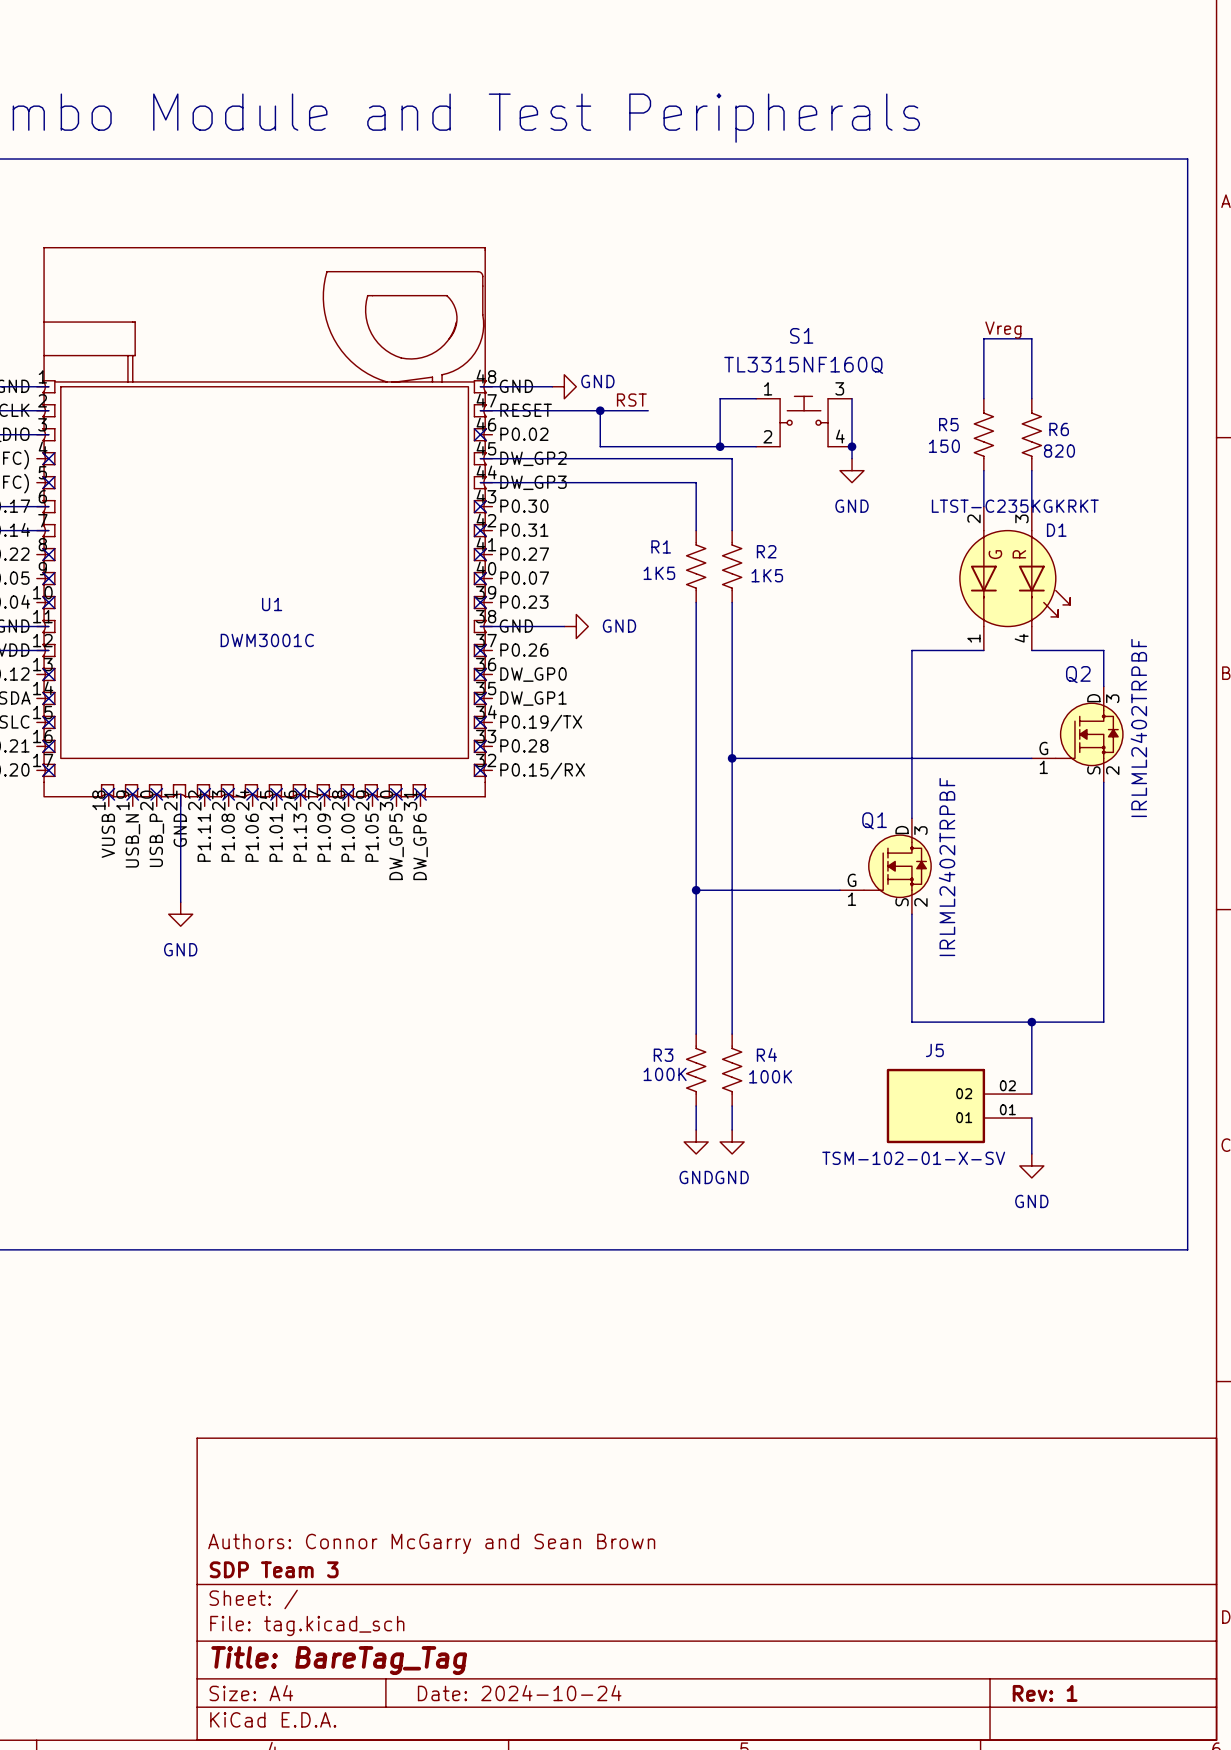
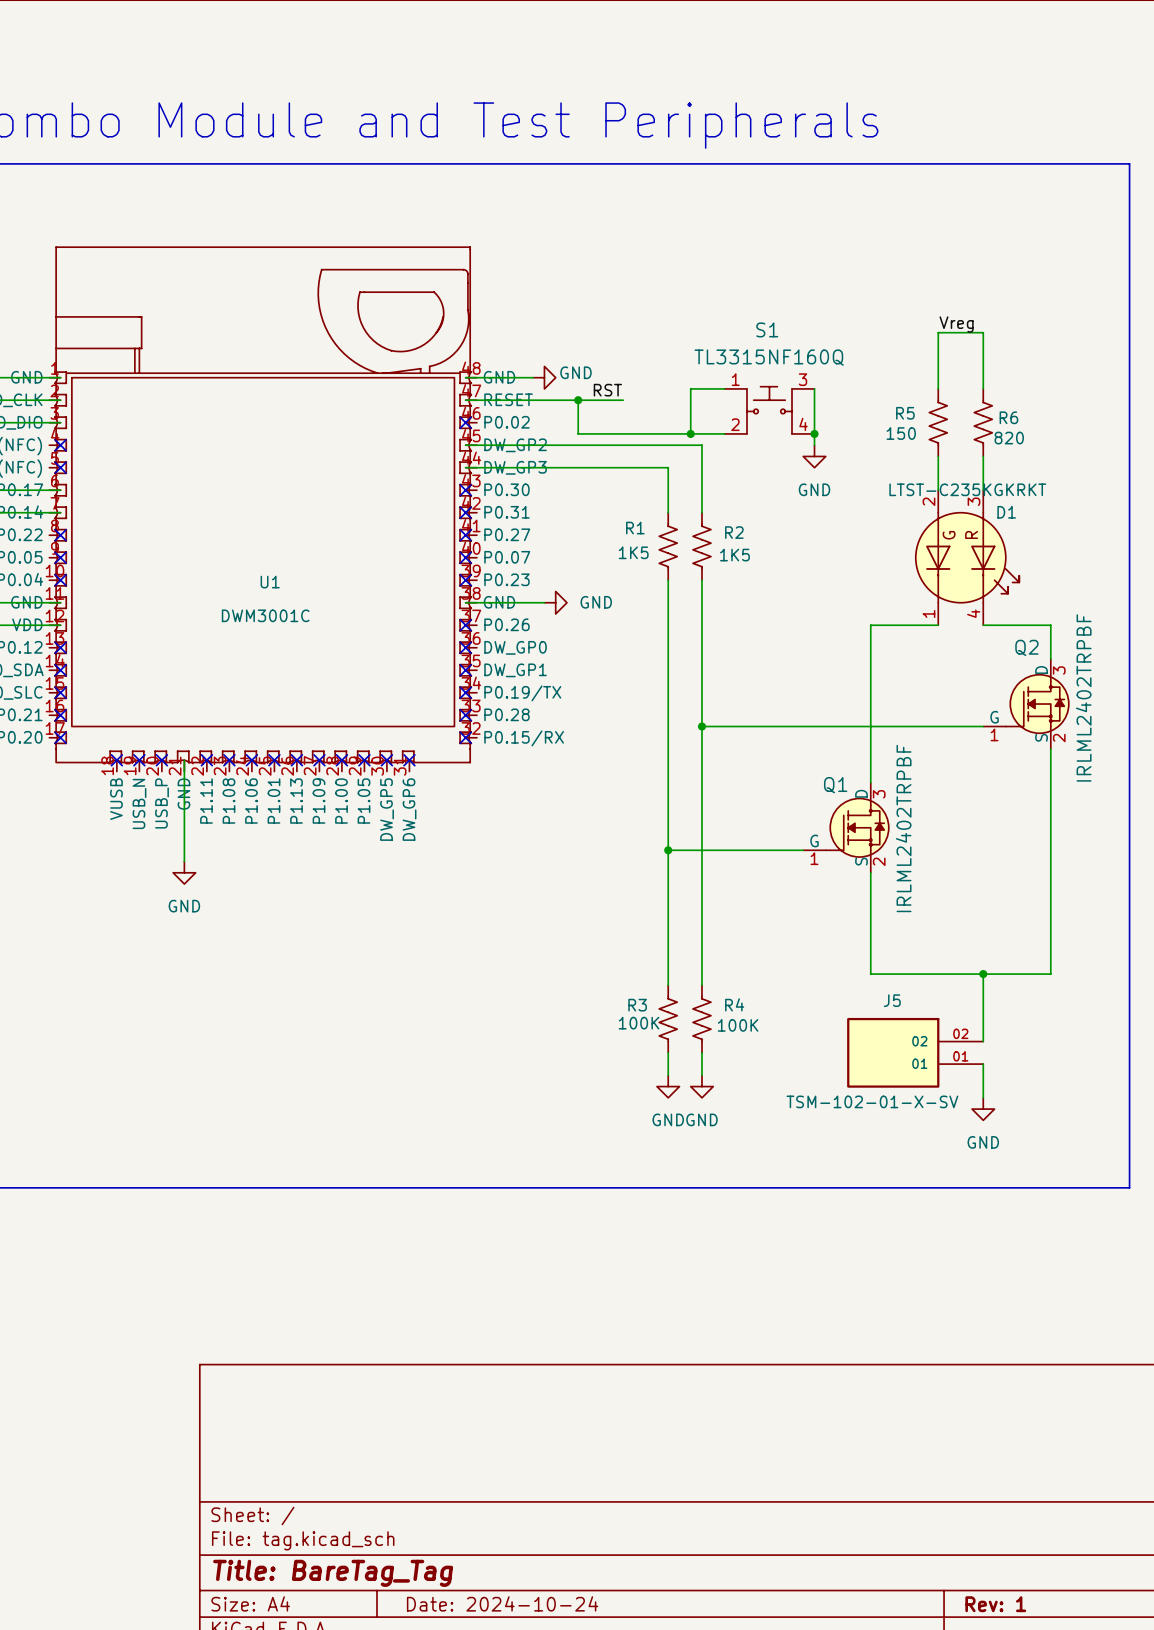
title block: Authors: Connor McGarry and Sean Brown (431, 1543) -> none
title block: SDP Team 3 (274, 1569) -> none

